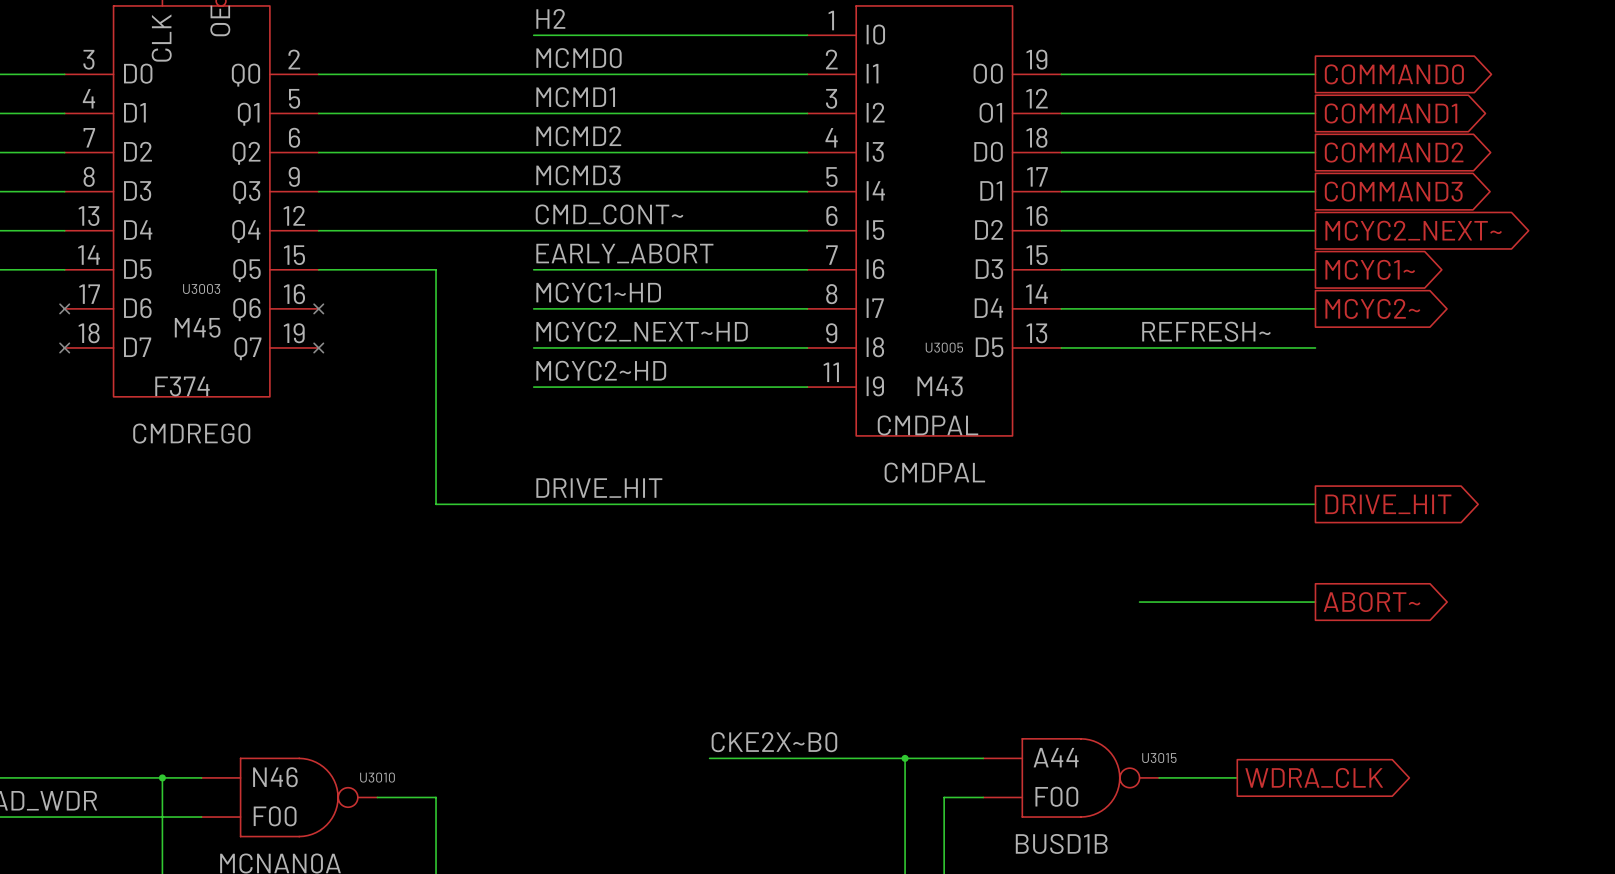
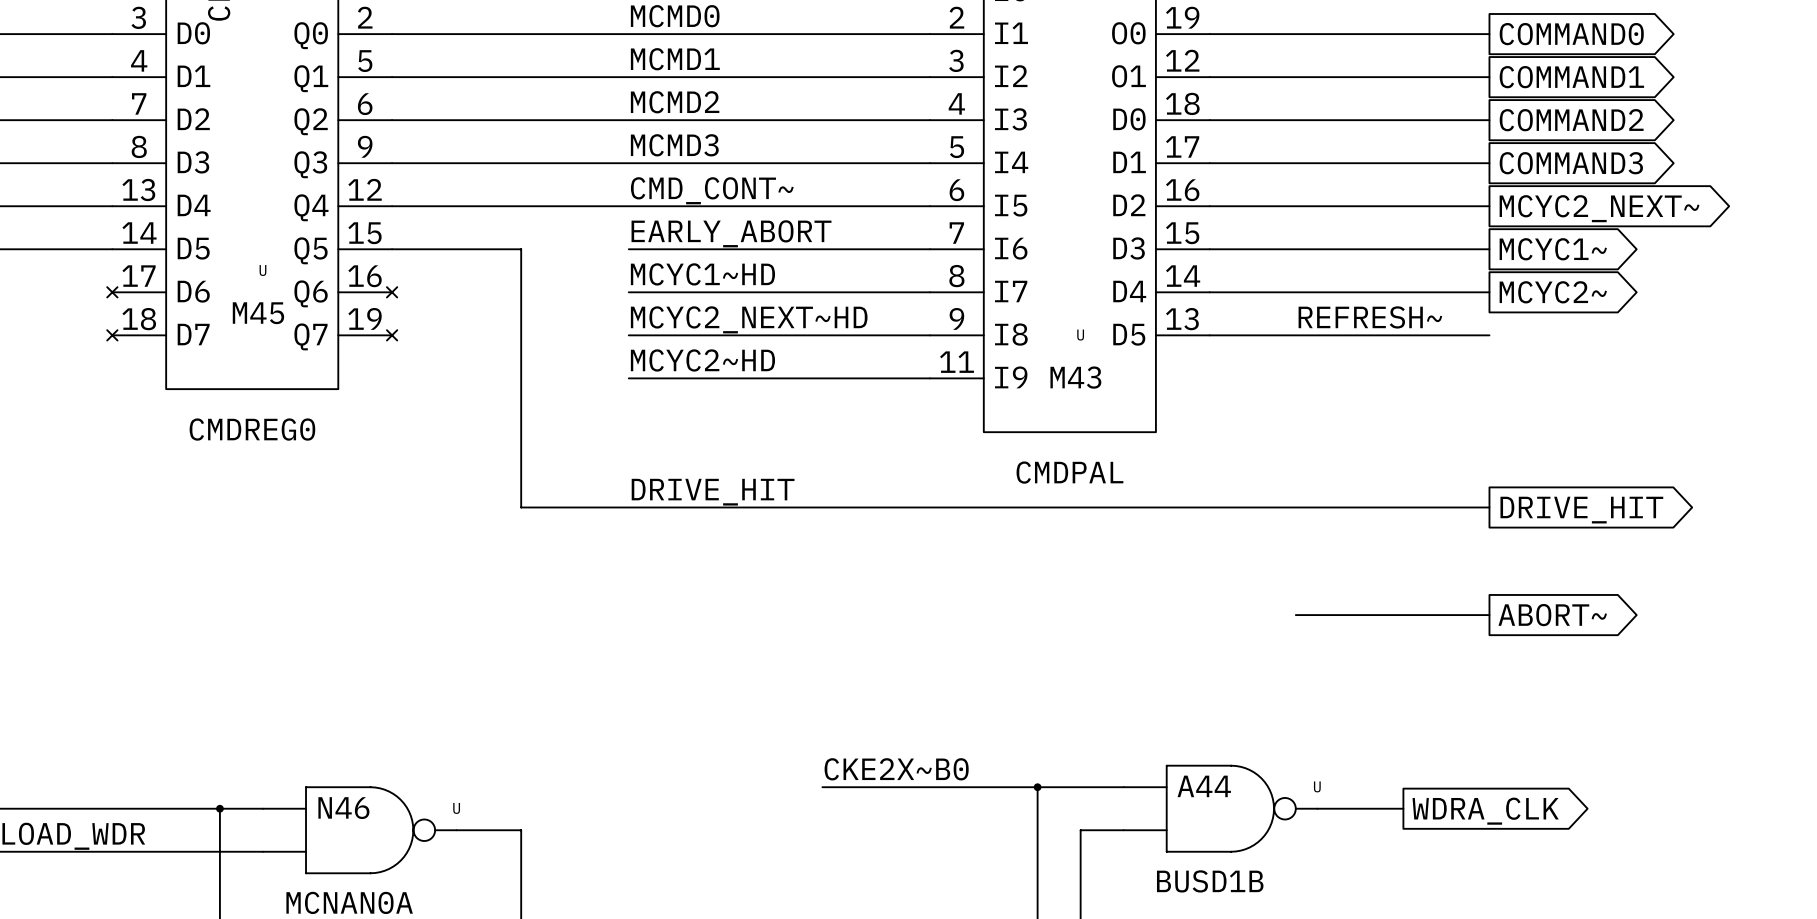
U3003 name: U3003 (201, 288) -> U (262, 270)
U3005 name: U3005 (944, 347) -> U (1080, 335)
U3003 value: F374 (182, 386) -> none
U3005 value: CMDPAL (927, 425) -> none
U3015 name: U3015 (1159, 758) -> U (1317, 786)
U3010 name: U3010 (377, 777) -> U (456, 808)
U3015 value: F00 (1056, 796) -> none
U3010 value: F00 (275, 816) -> none

